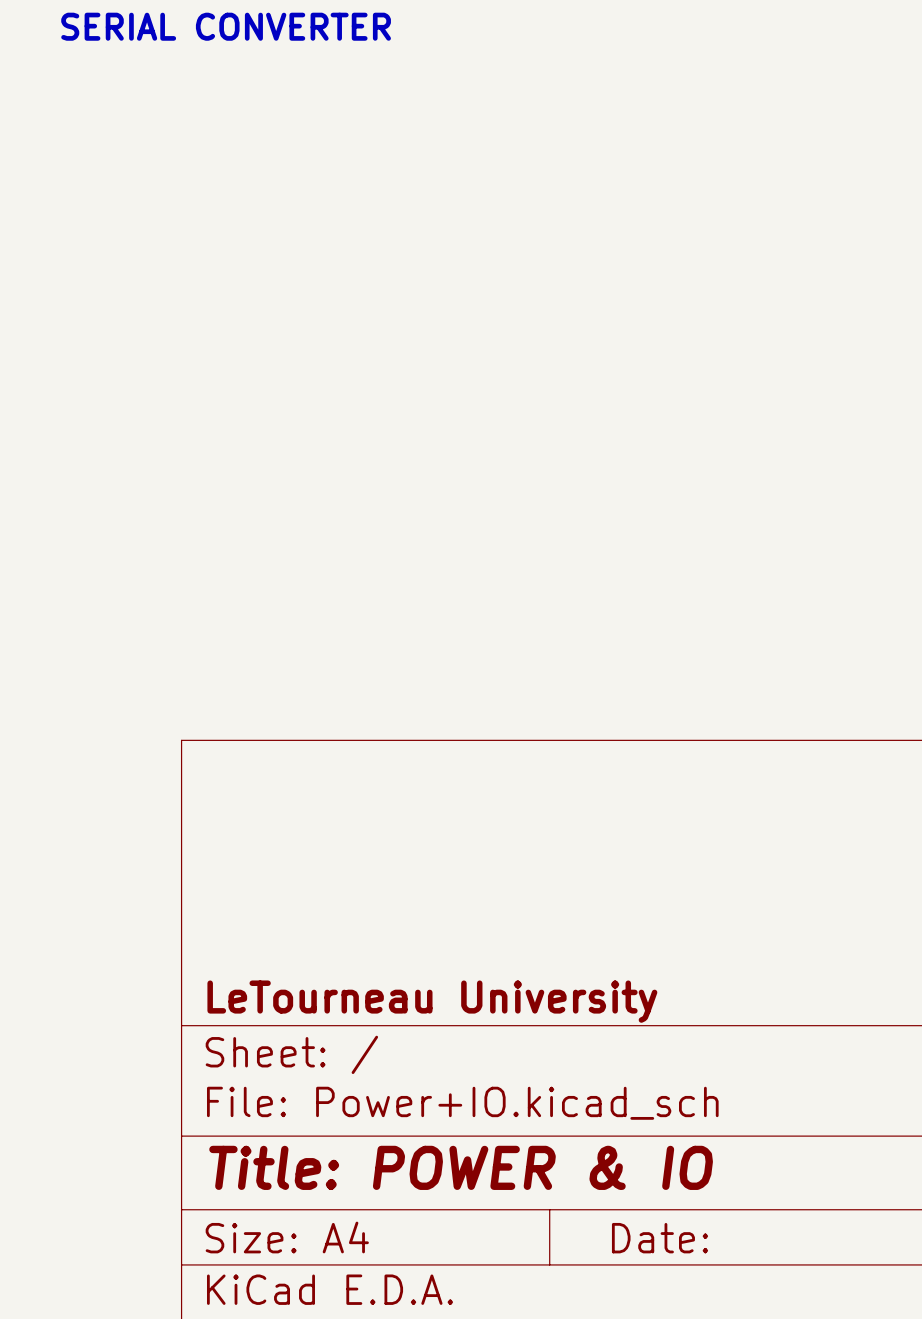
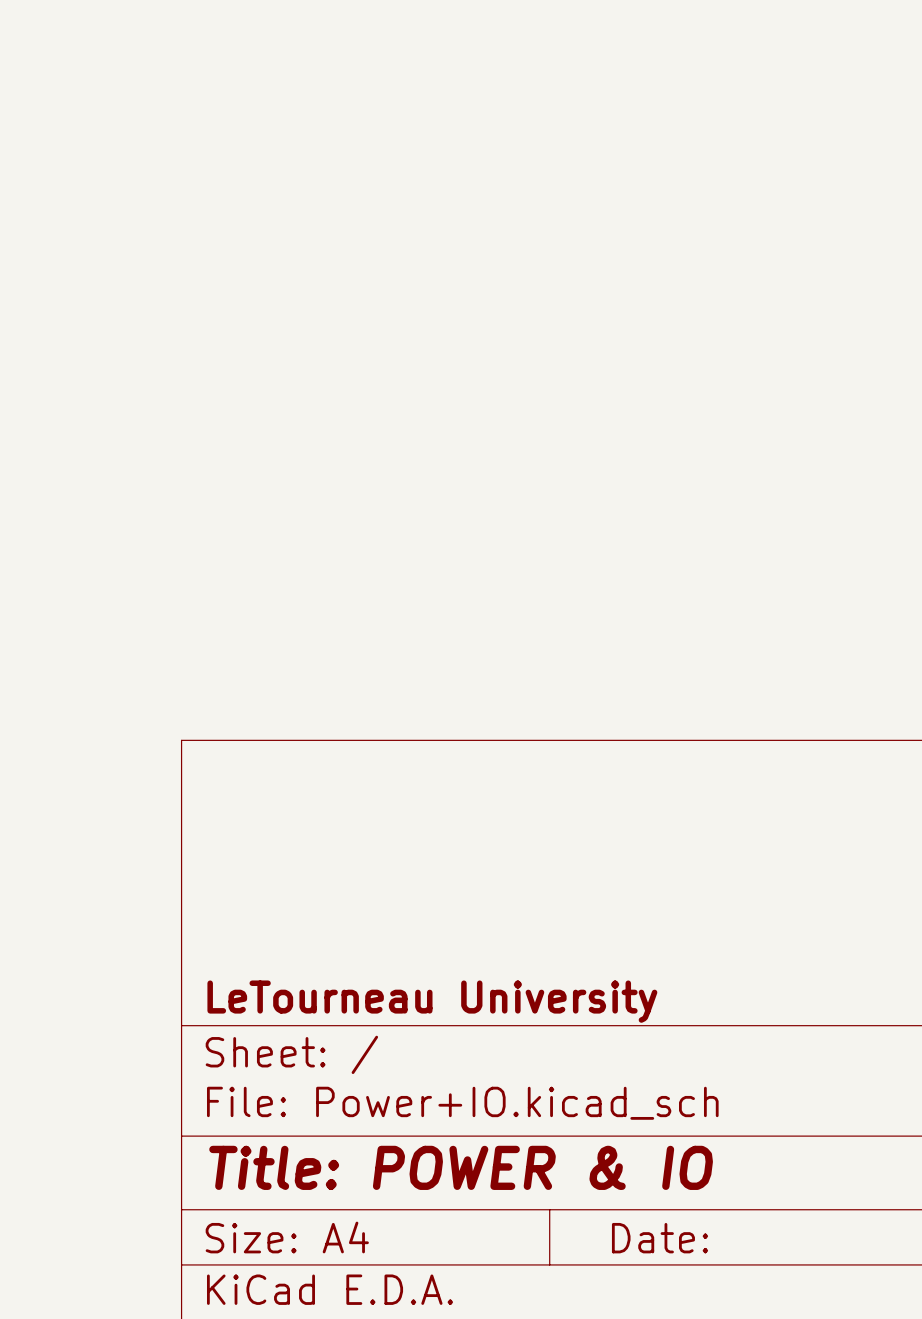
text: SERIAL CONVERTER (226, 26) -> none

